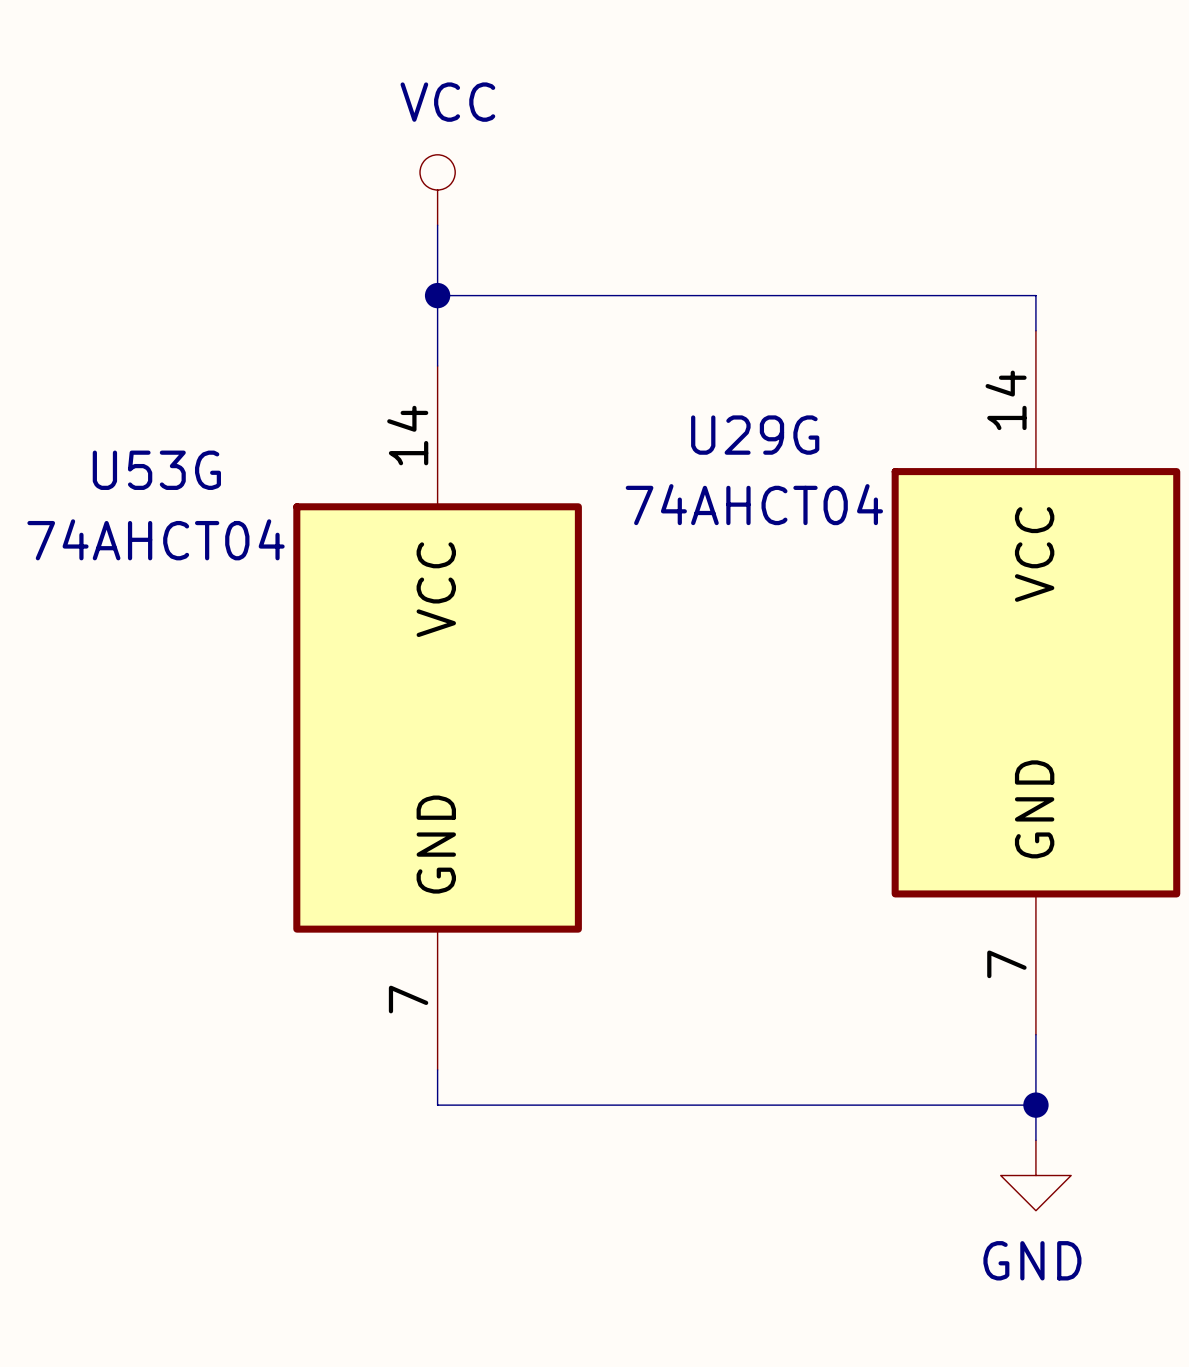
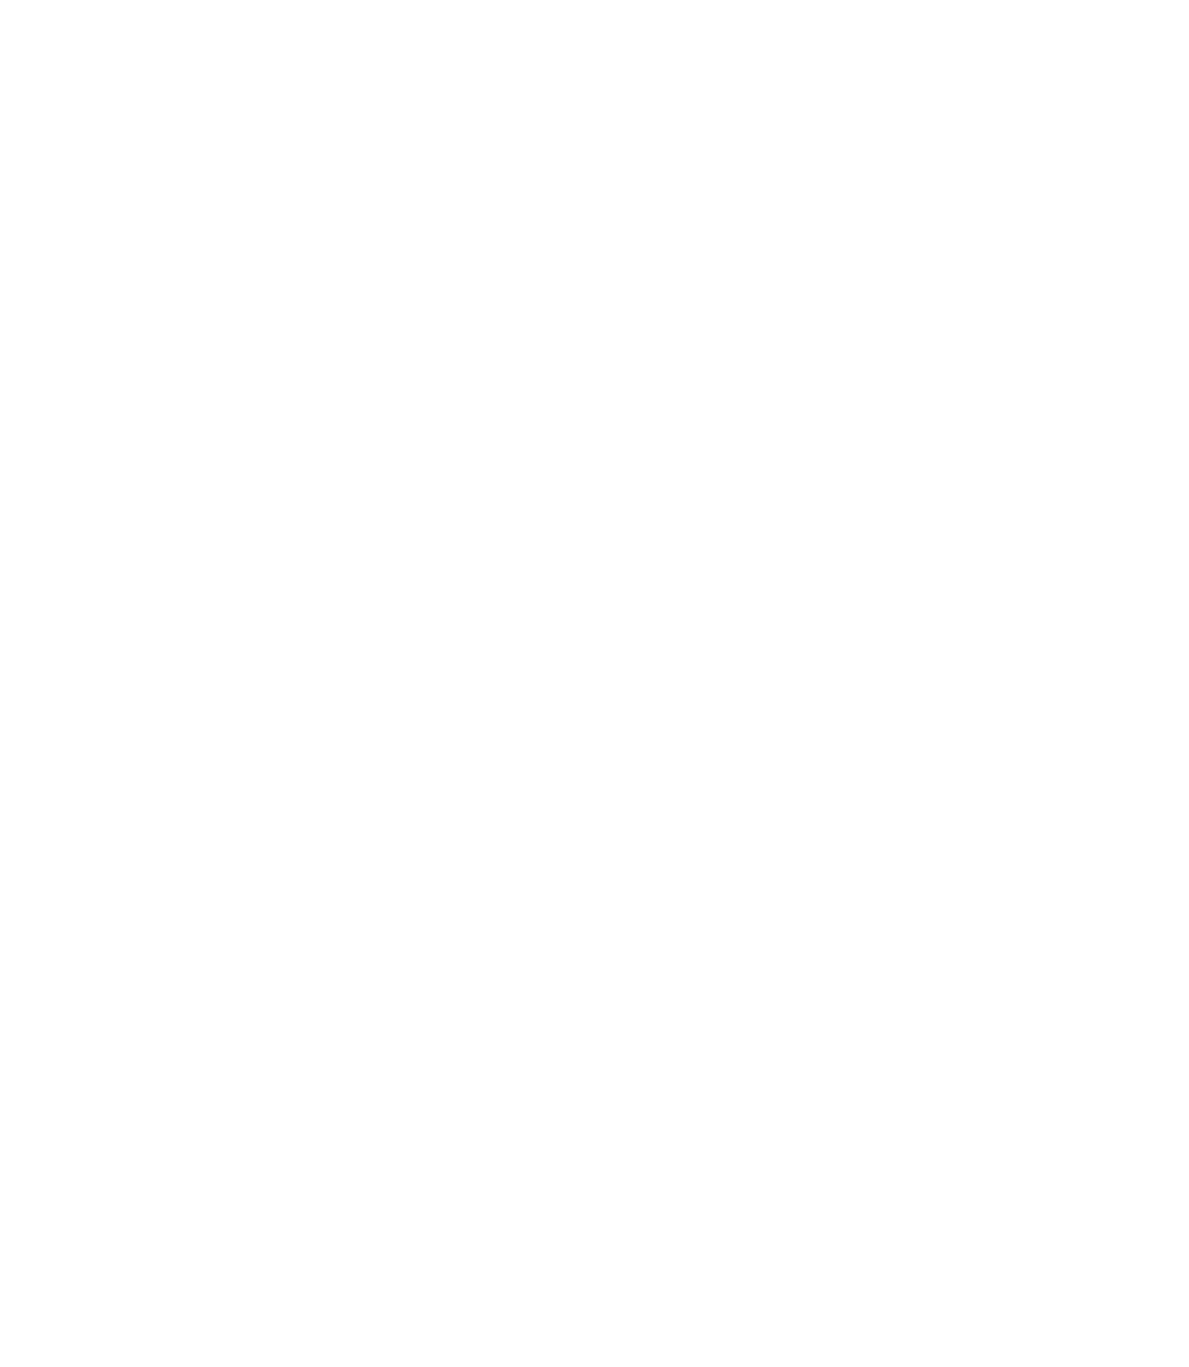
power symbol: VCC (437, 190) -> none
wire: (437, 225) (437, 365) -> none
wire: (437, 295) (1035, 295) (1035, 330) -> none
junction: (437, 295) -> none
U29G: 74AHCT04 (1035, 682) -> none
U53G: 74AHCT04 (437, 717) -> none
wire: (1035, 1034) (1035, 1140) -> none
wire: (437, 1069) (437, 1105) (1035, 1105) -> none
junction: (1035, 1105) -> none
power symbol: GND (1035, 1175) -> none

